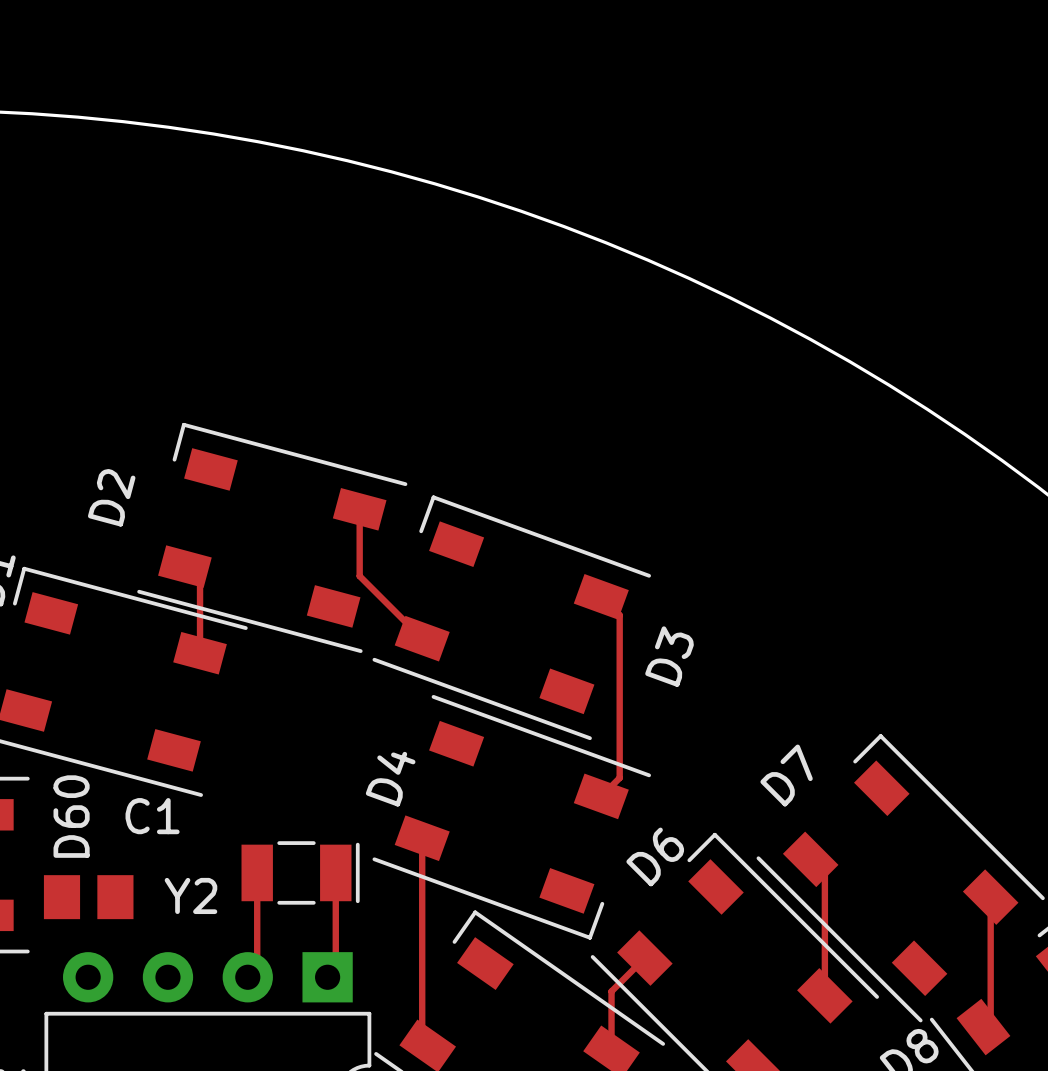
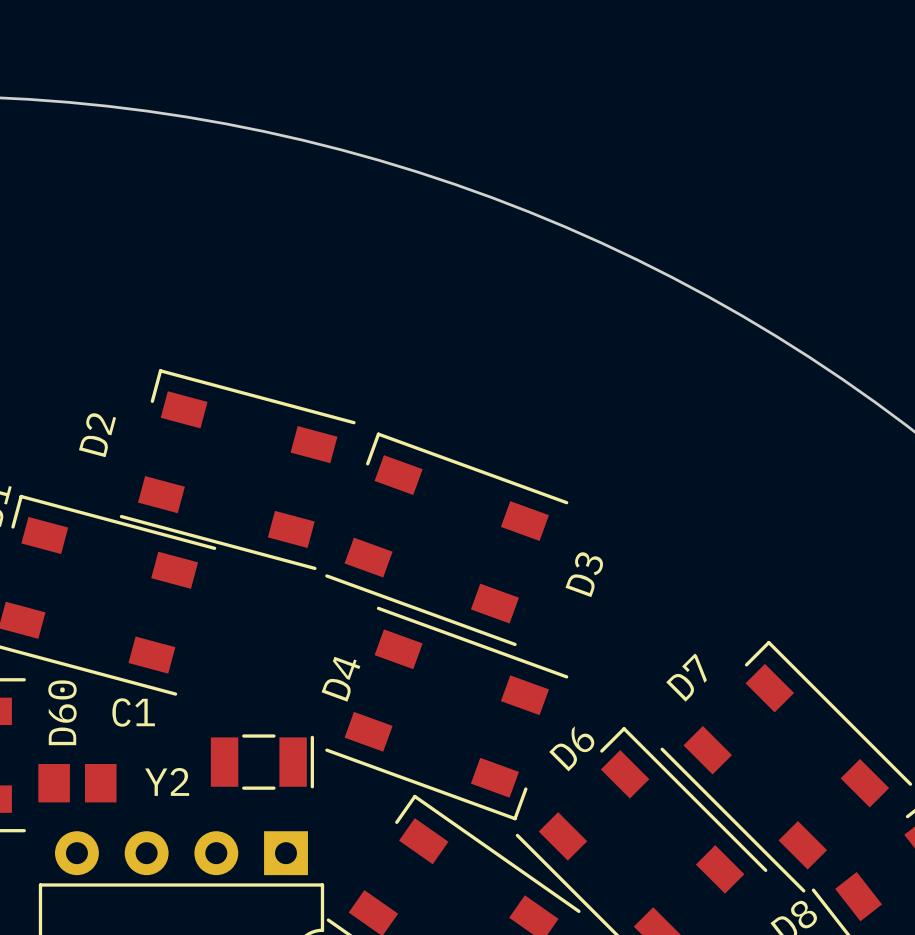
track: (359, 509) (359, 576) (422, 638) -> none
track: (184, 566) (200, 581) (200, 653) -> none
track: (601, 596) (619, 615) (619, 778) (601, 796) -> none
track: (422, 838) (422, 1040) (427, 1045) -> none
track: (810, 859) (824, 873) (824, 995) -> none
track: (257, 872) (257, 967) (247, 977) -> none
track: (335, 872) (335, 969) (327, 977) -> none
track: (990, 897) (990, 1019) (983, 1027) -> none
track: (644, 958) (611, 991) (611, 1051) -> none

